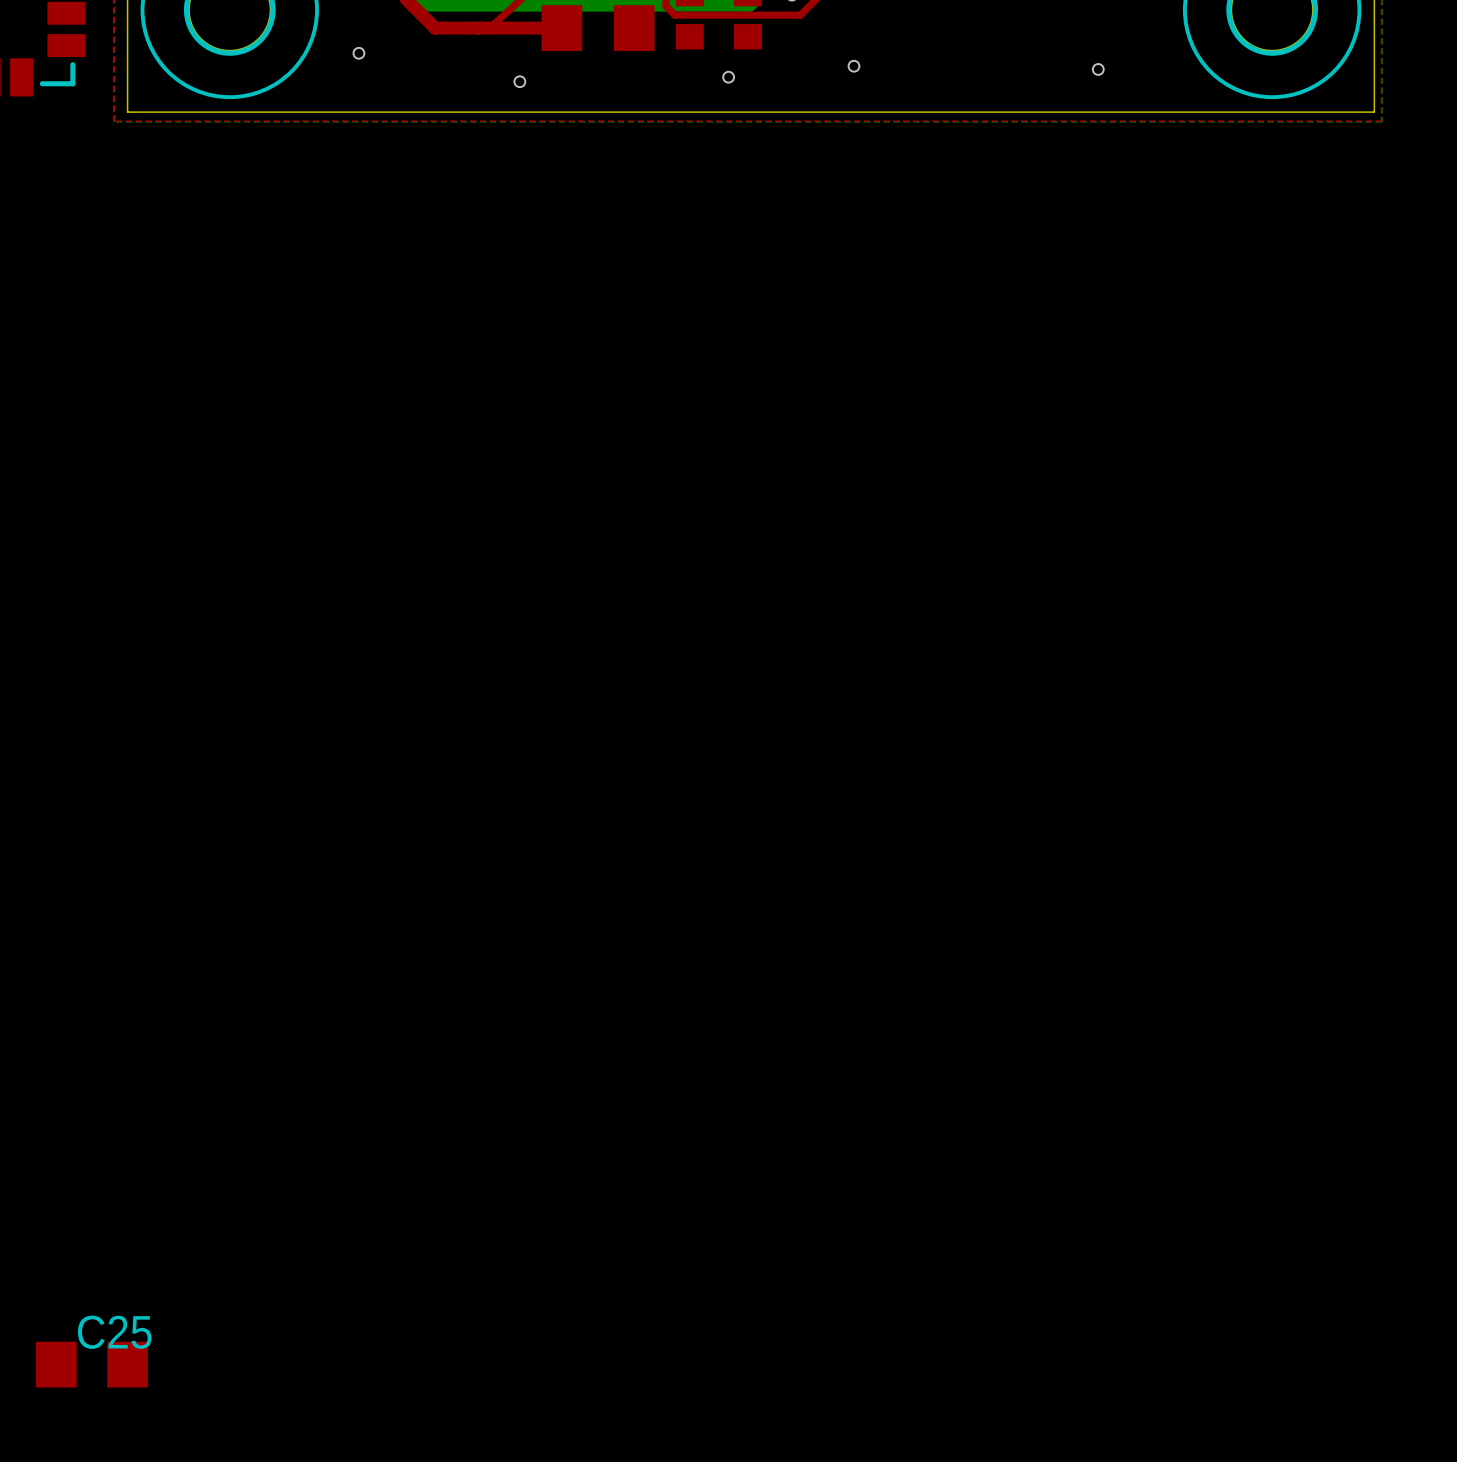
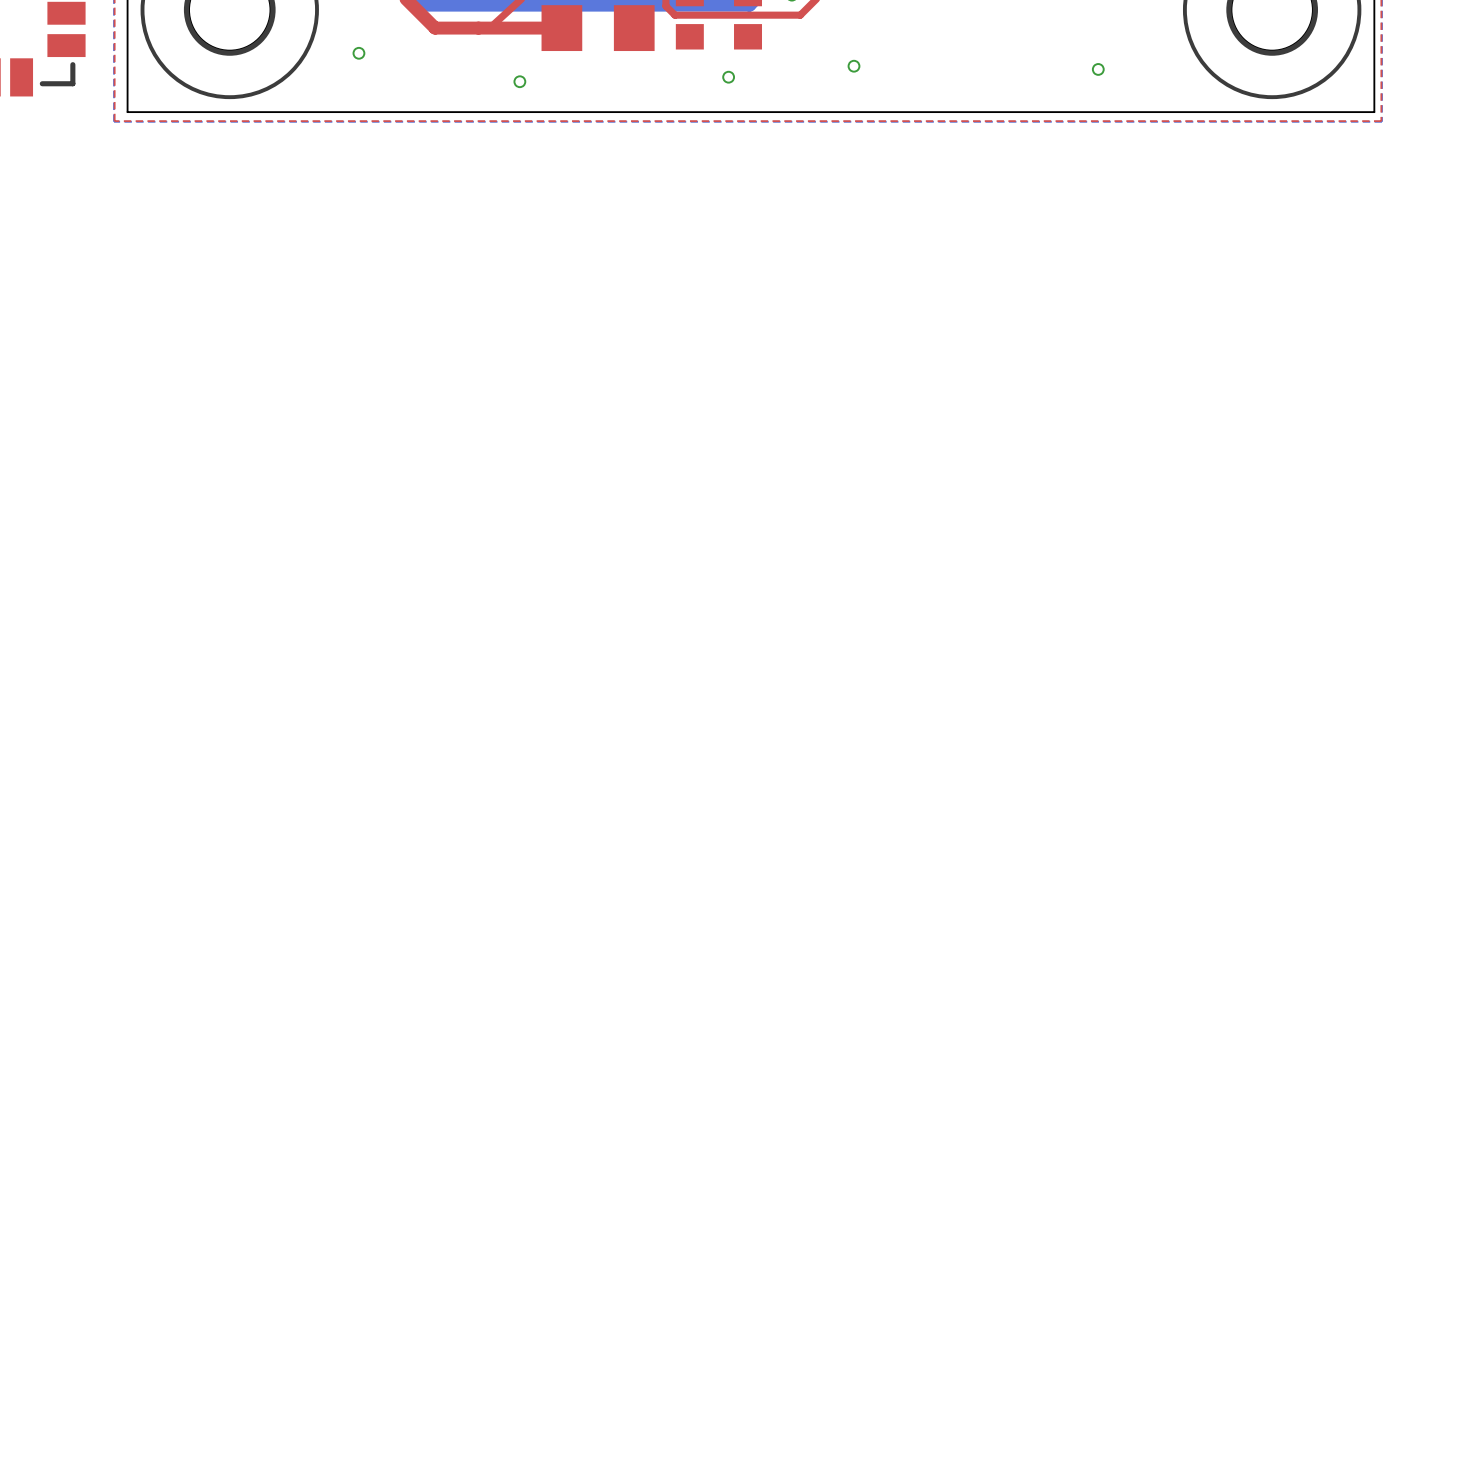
C25: (91, 1364) -> none

